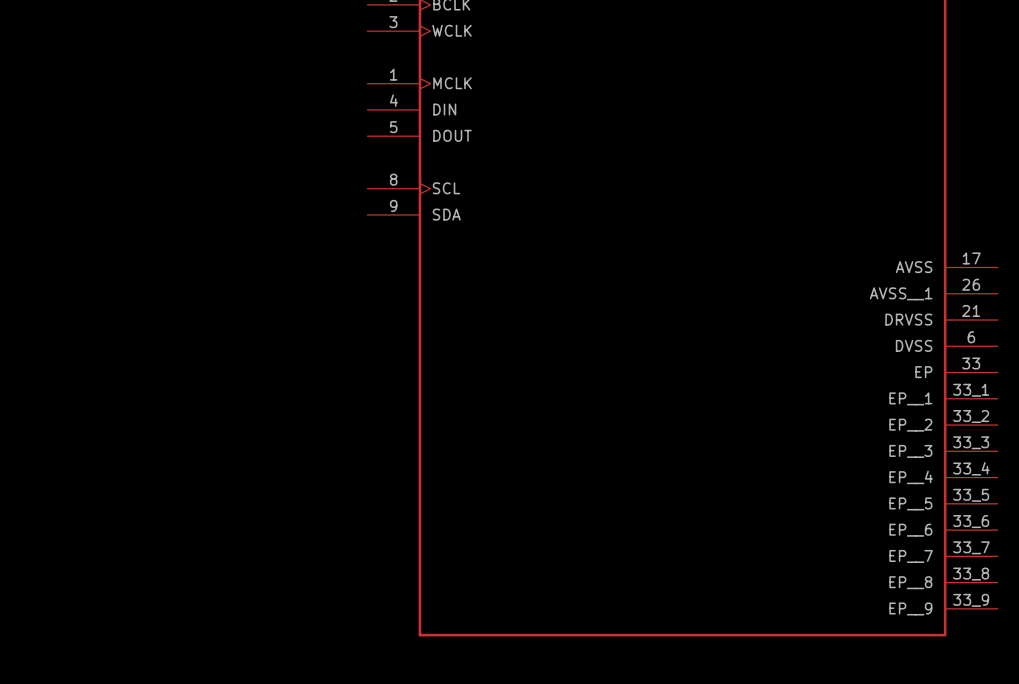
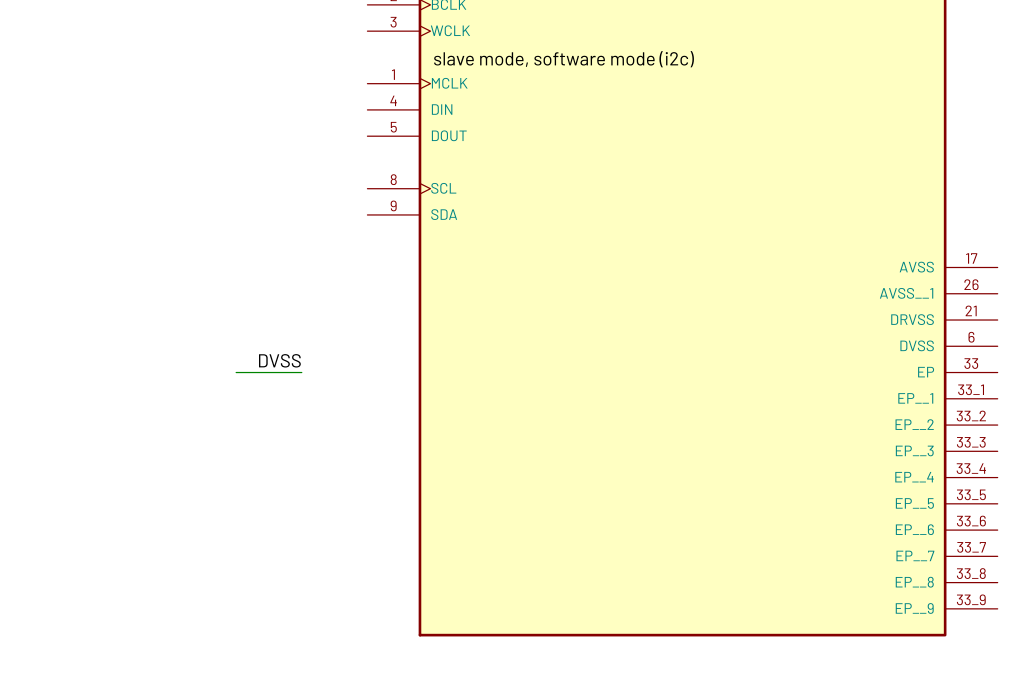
label: none -> slave mode, software mode (i2c) (564, 59)
label: none -> DVSS (279, 360)
wire: none -> (236, 372) (301, 372)

